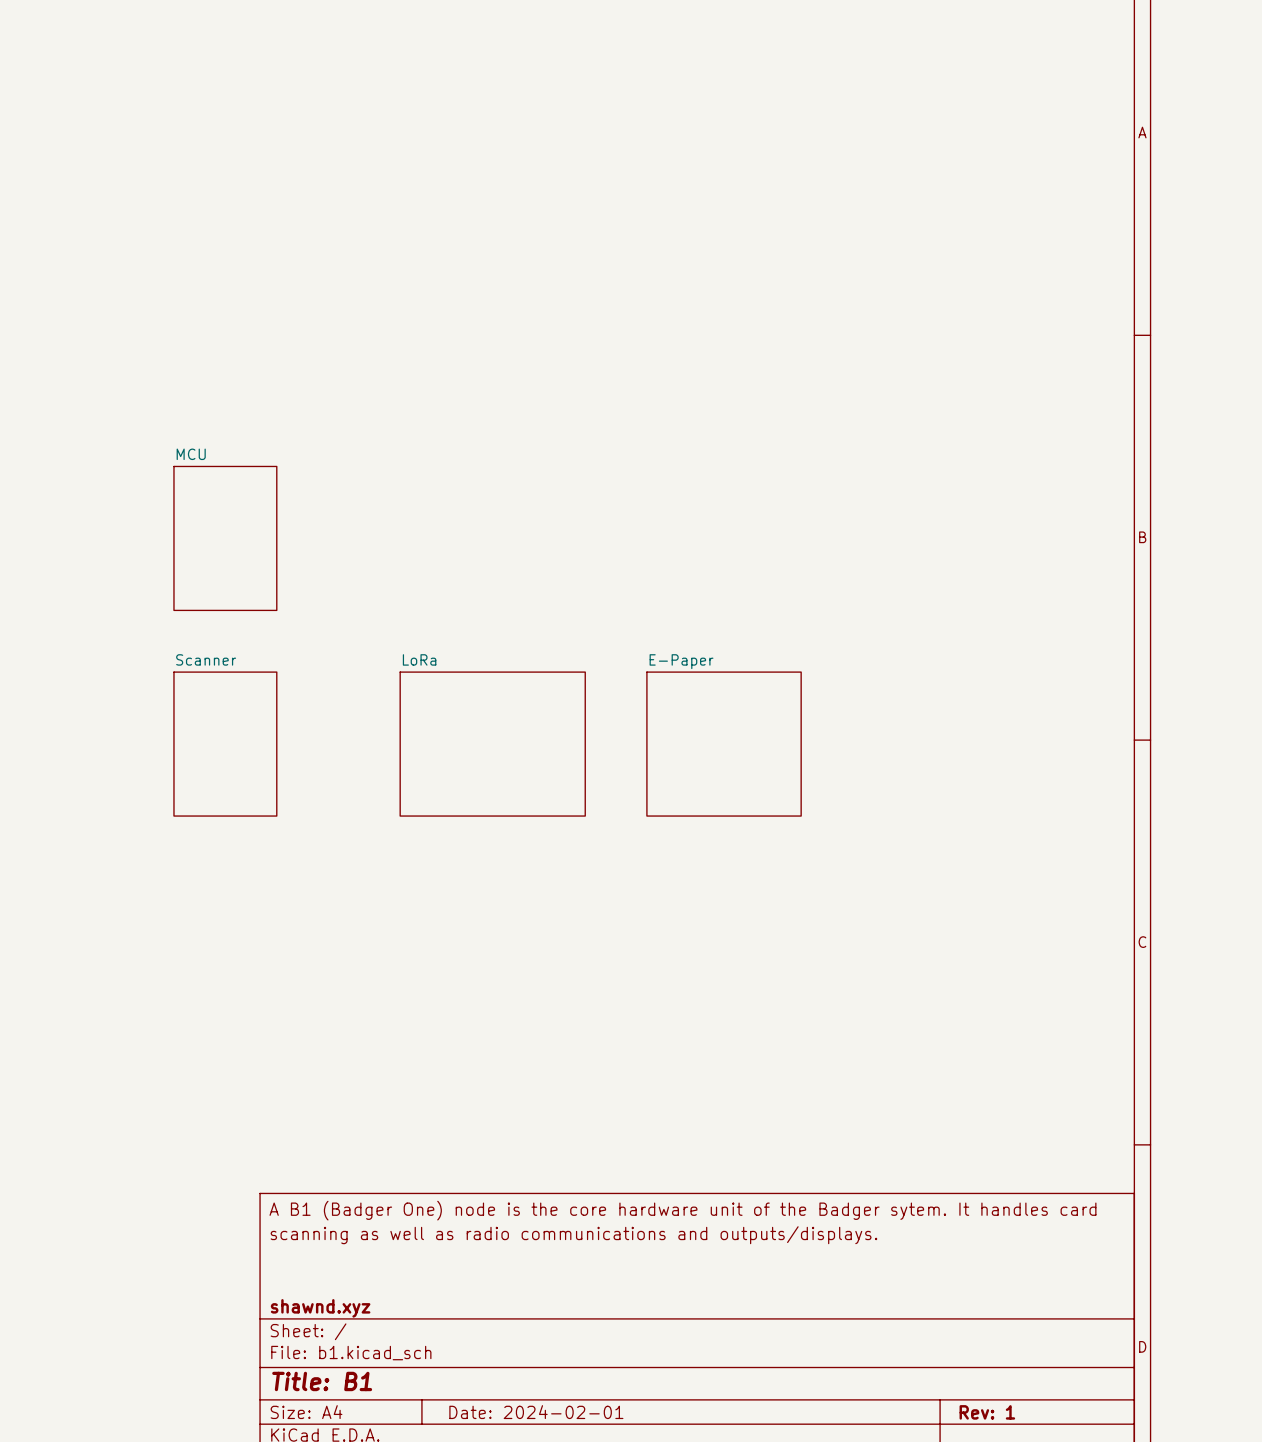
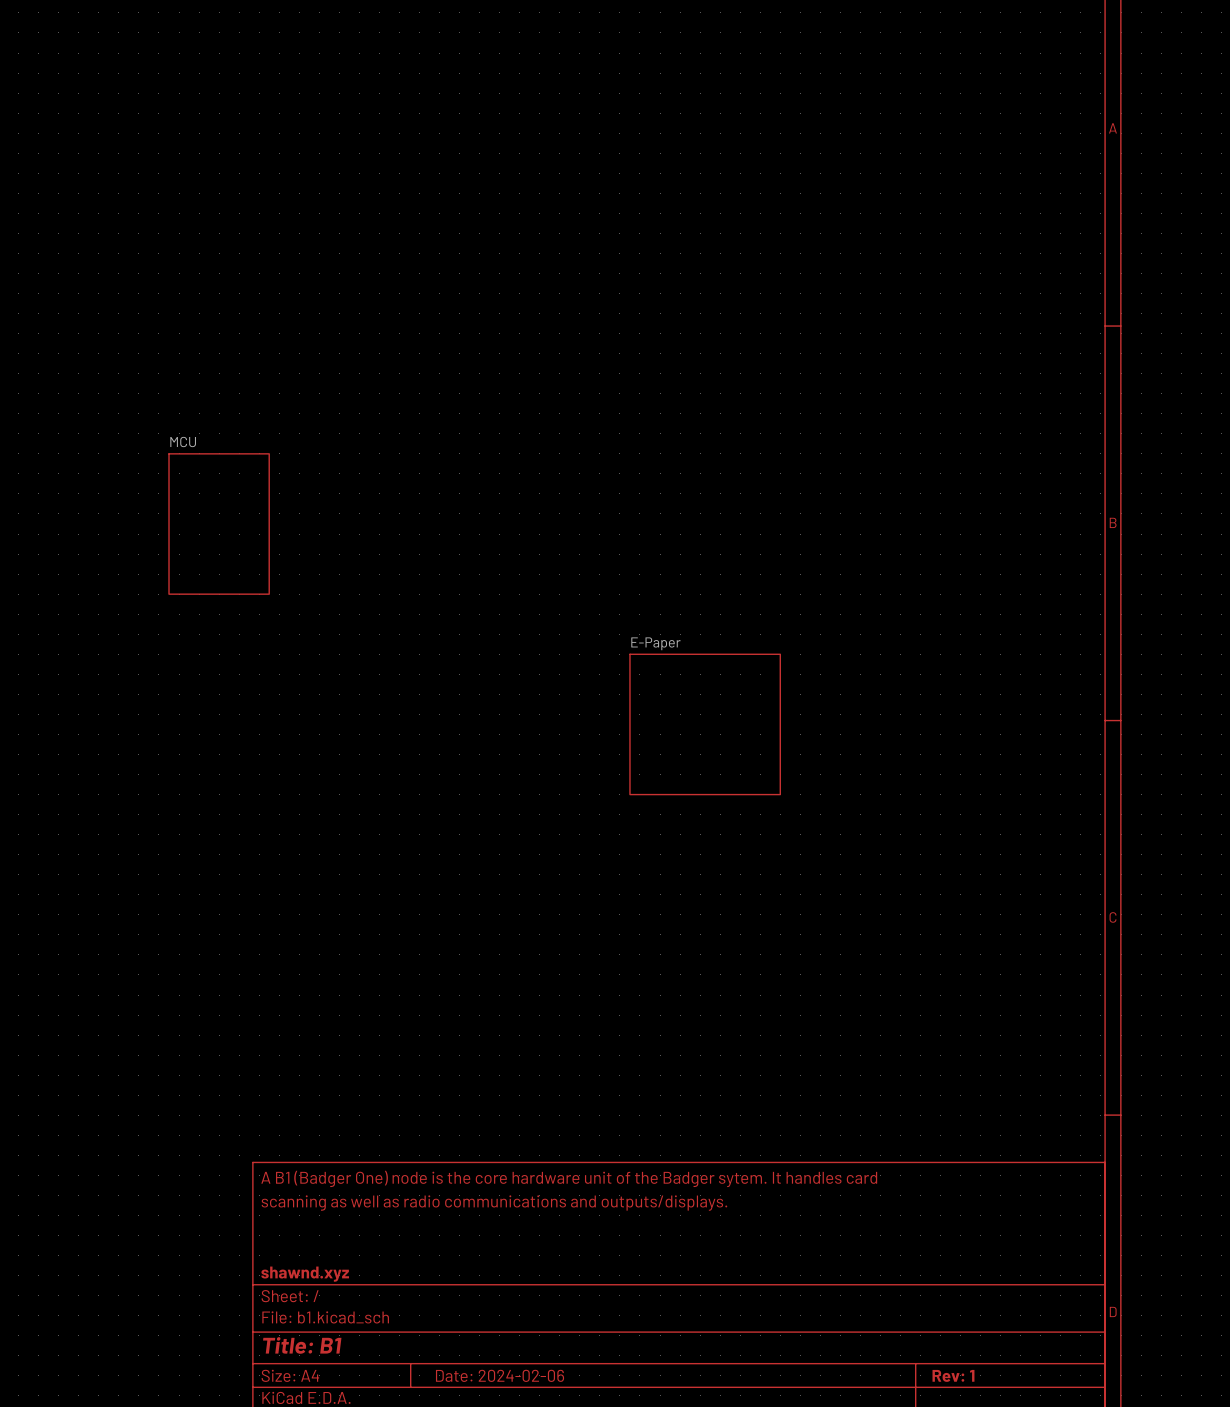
sheet Scanner: (225, 744) -> none
sheet LoRa: (492, 744) -> none
title block: Date: 2024-02-01 (536, 1412) -> Date: 2024-02-06 (500, 1375)

